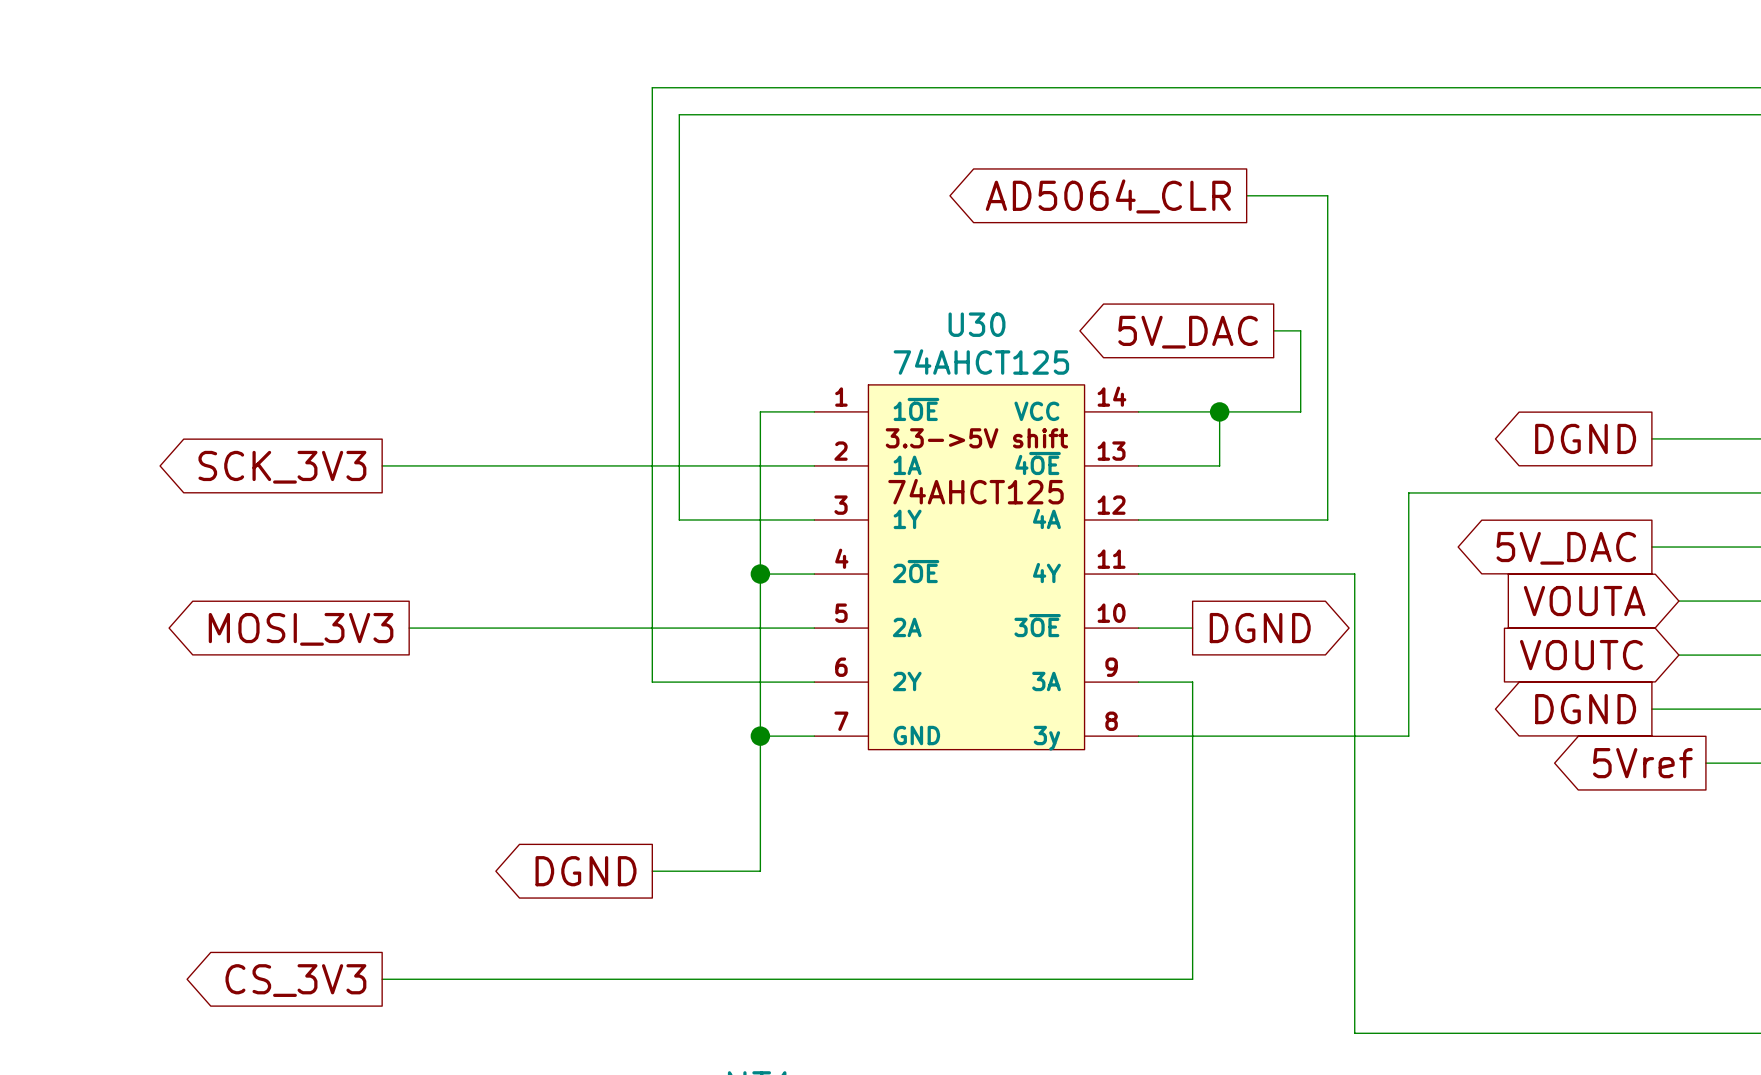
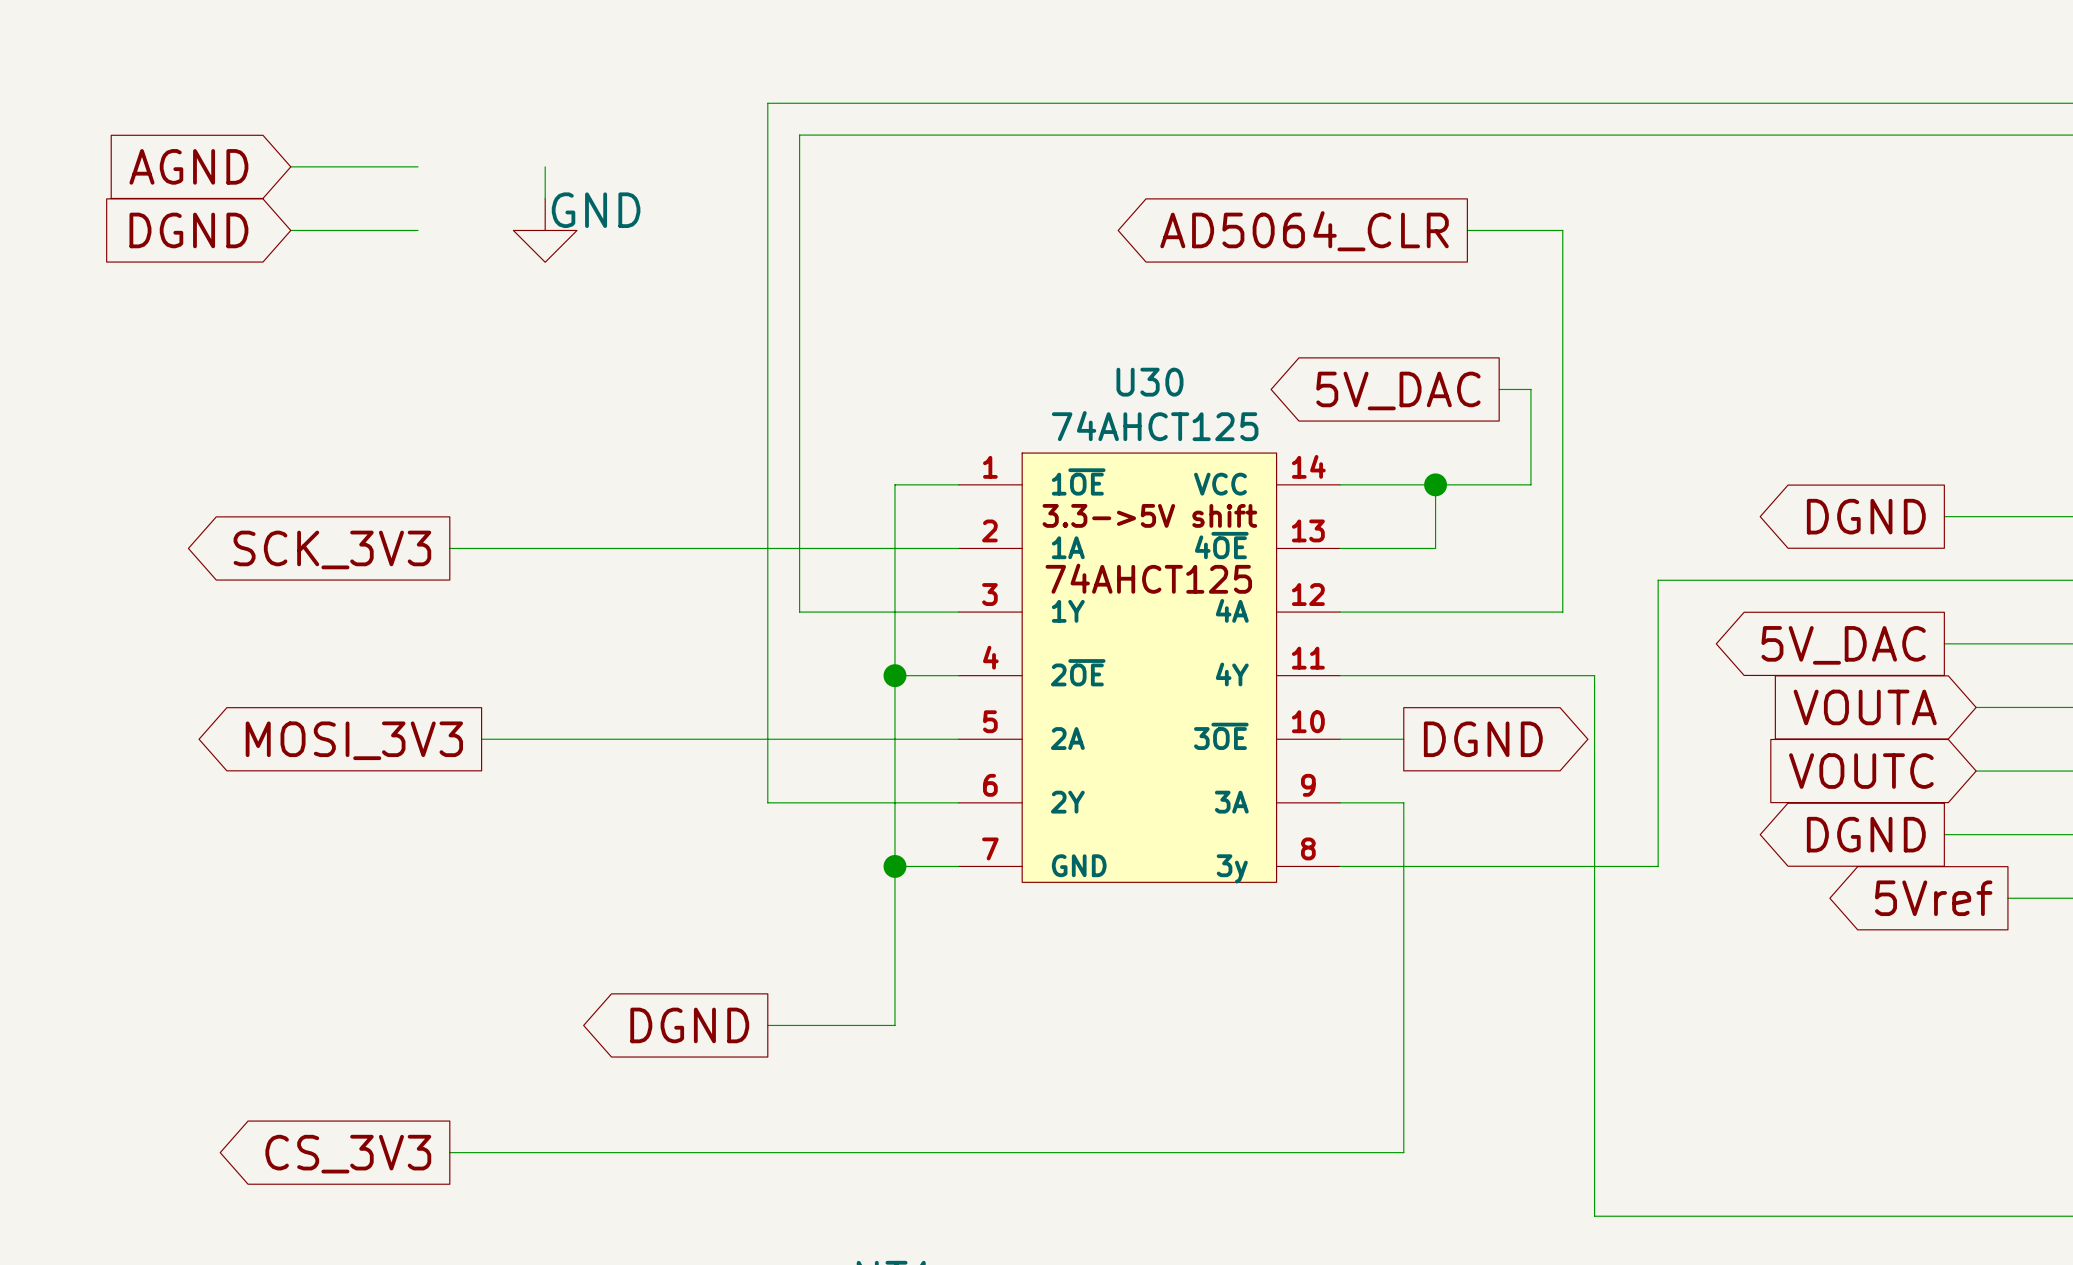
global label: none -> AGND (188, 166)
wire: none -> (290, 166) (418, 166)
wire: none -> (545, 166) (545, 198)
global label: none -> DGND (188, 230)
wire: none -> (290, 230) (418, 230)
power symbol: none -> GND (545, 230)

